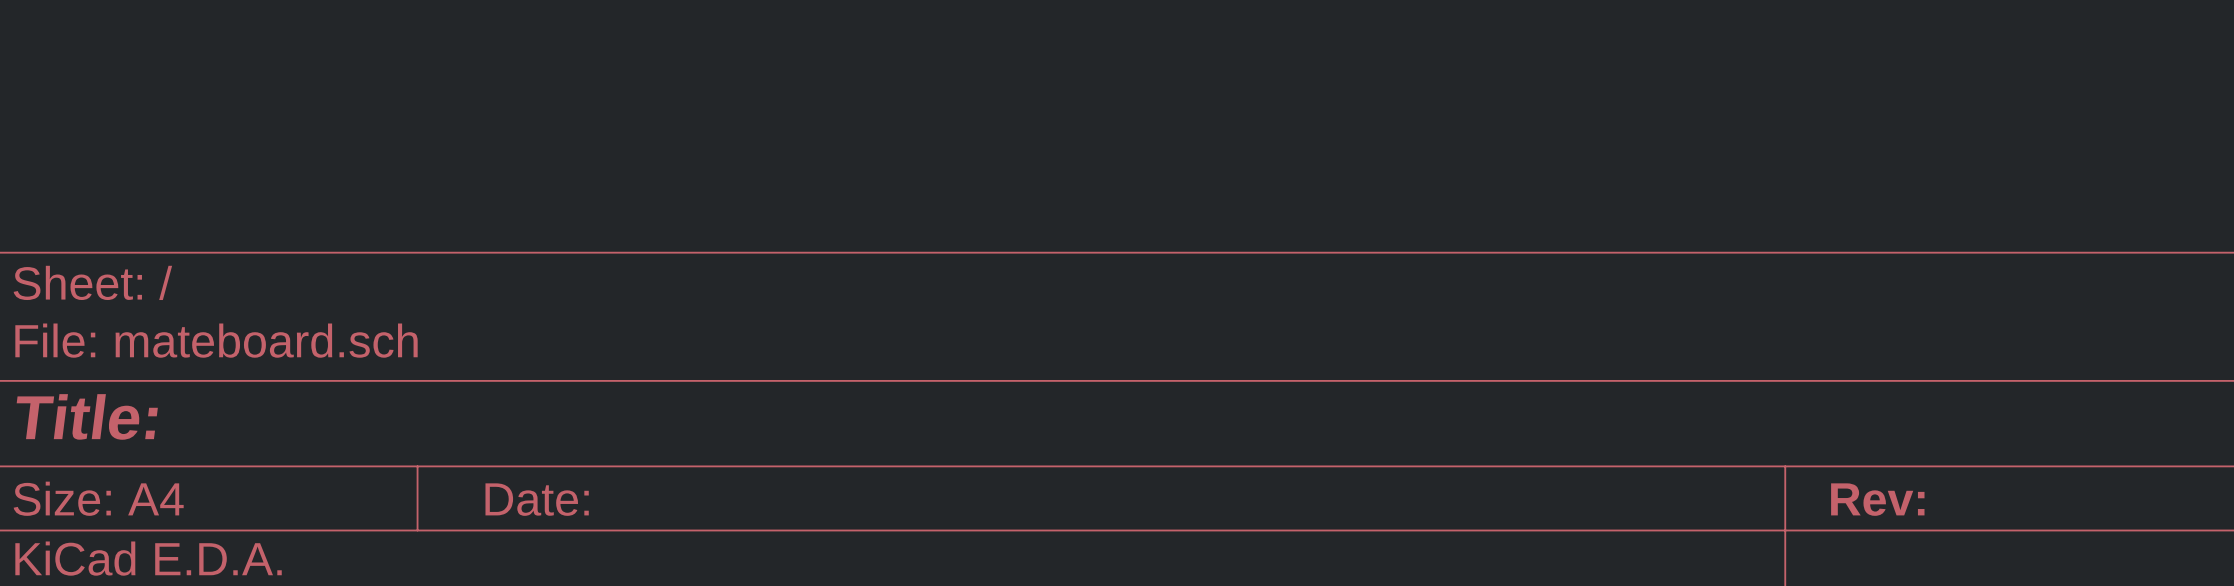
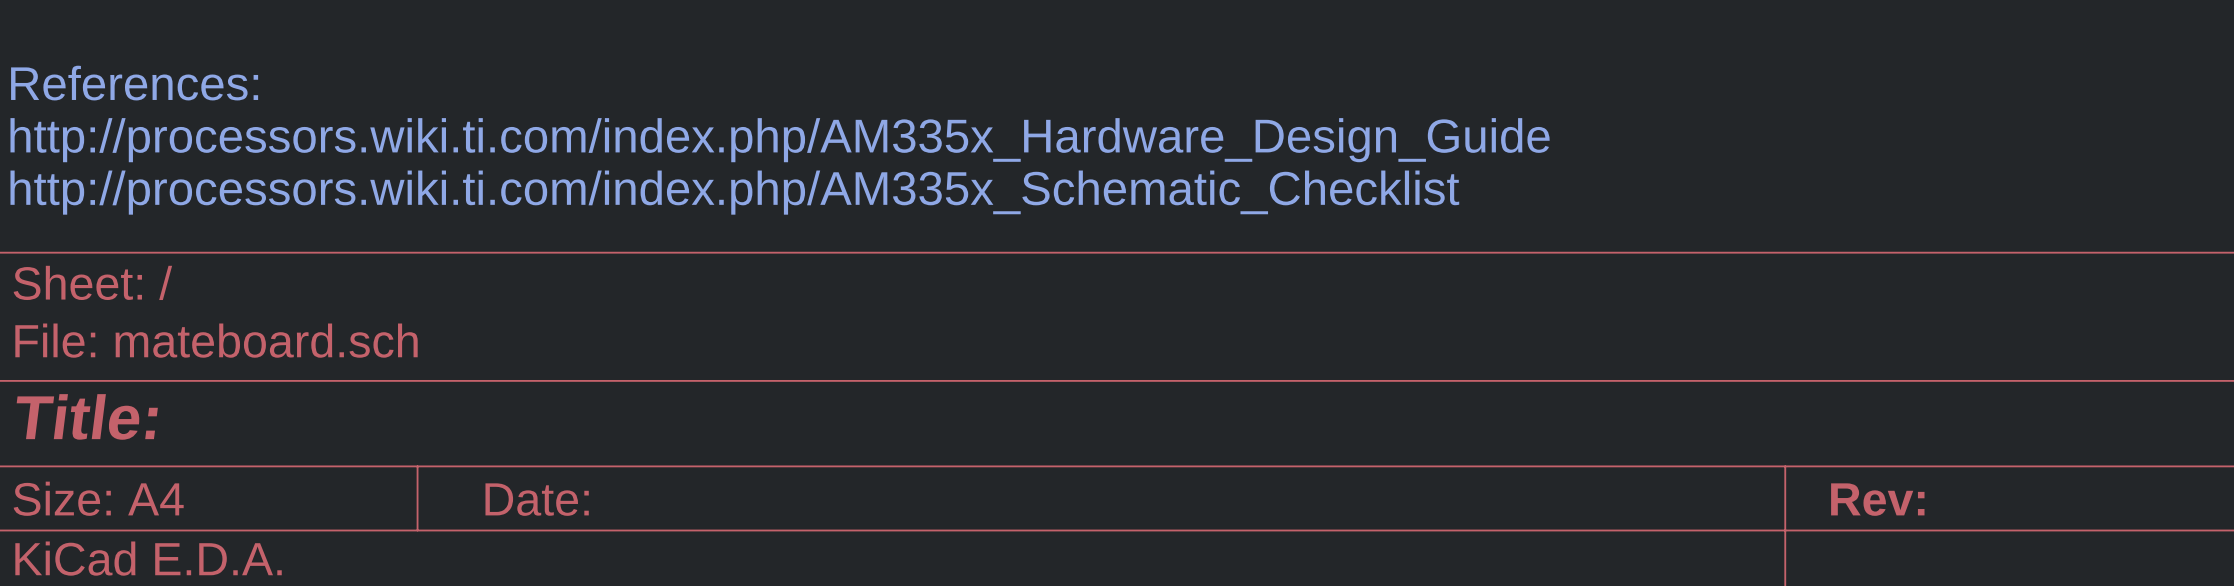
text: none -> References: (134, 83)
text: none -> http://processors.wiki.ti.com/index.php/AM335x_Hardware_Design_Guide (780, 140)
text: none -> http://processors.wiki.ti.com/index.php/AM335x_Schematic_Checklist (734, 192)

